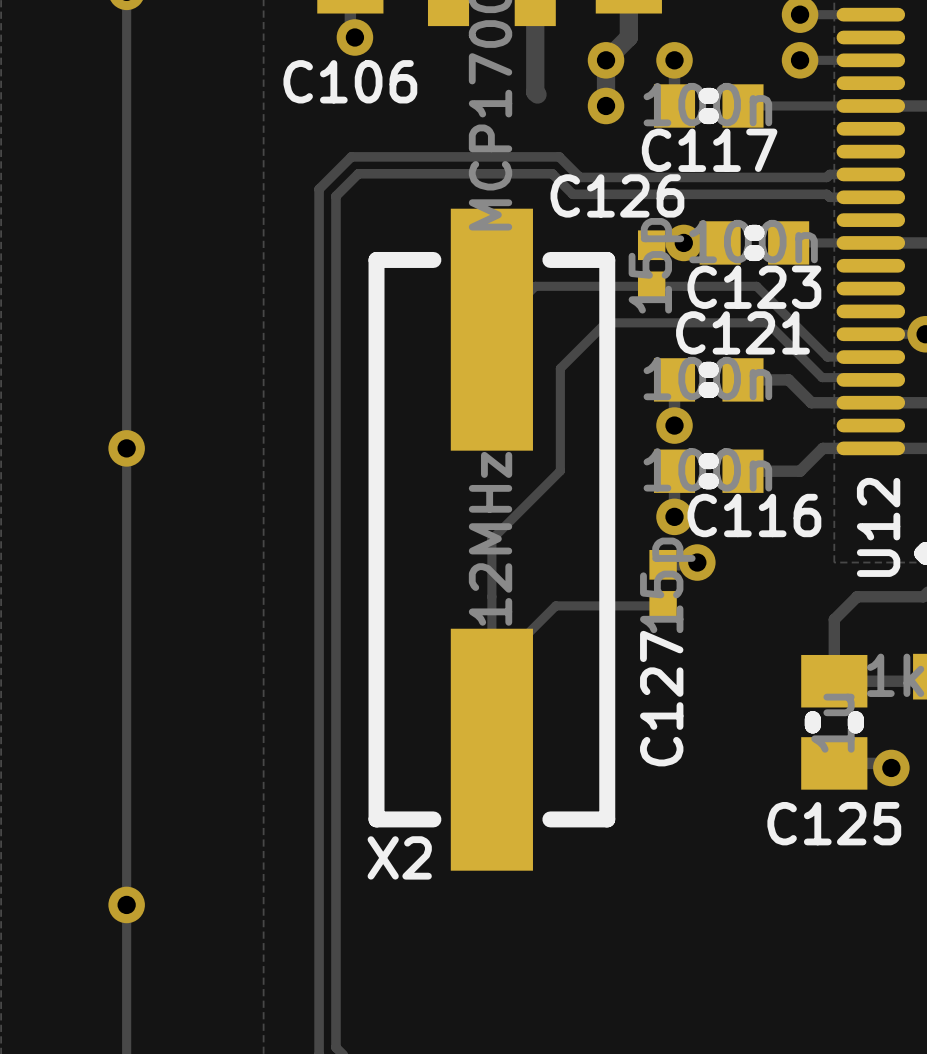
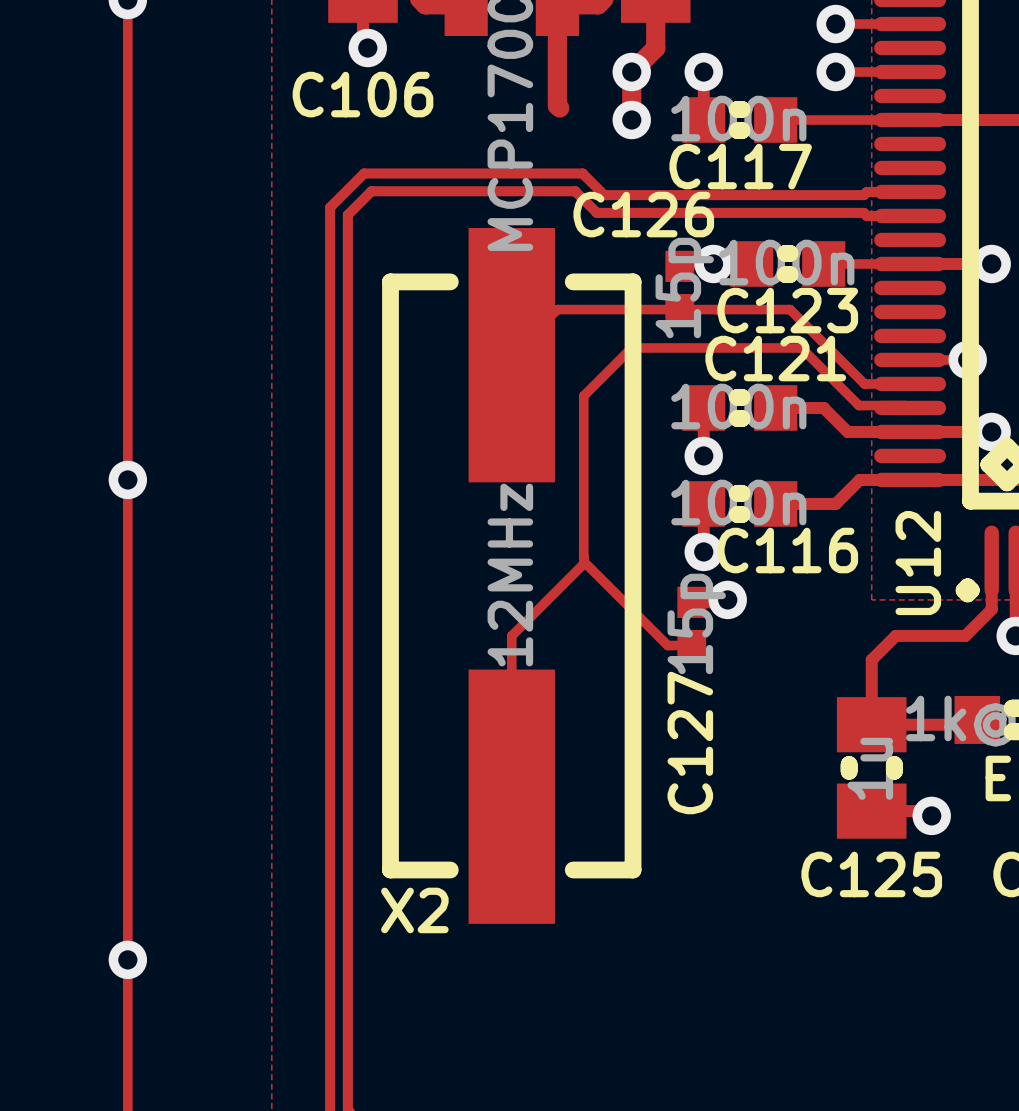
track: (560, 470) (491, 539) (491, 596) -> (583, 503) (583, 563) (511, 635)
track: (640, 605) (555, 605) (491, 669) -> (667, 645) (583, 561)

